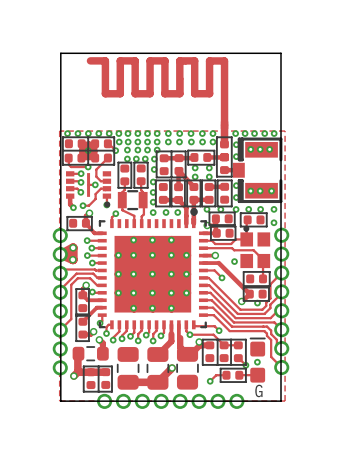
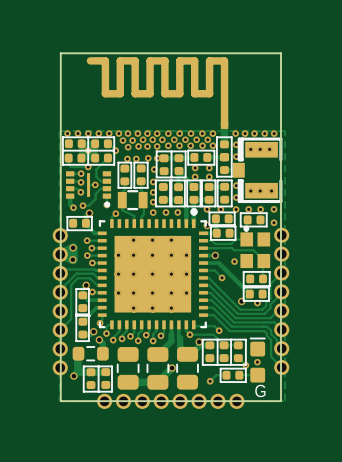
via: none -> (143, 139)
via: none -> (152, 139)
via: none -> (162, 139)
via: none -> (174, 139)
via: none -> (185, 139)
via: none -> (196, 139)
via: none -> (207, 139)
via: none -> (122, 140)
via: none -> (132, 140)
via: (119, 142) -> none
via: (128, 142) -> none
via: (137, 142) -> none
via: (147, 142) -> none
via: (157, 142) -> none
via: (168, 142) -> none
via: (179, 142) -> none
via: (191, 142) -> none
via: (202, 142) -> none
via: (212, 142) -> none
via: none -> (168, 145)
via: none -> (179, 145)
via: none -> (190, 145)
via: none -> (202, 145)
via: none -> (212, 145)
via: none -> (138, 146)
via: none -> (147, 146)
via: none -> (157, 146)
via: none -> (128, 147)
via: (127, 150) -> none
via: (137, 150) -> none
via: (147, 150) -> none
via: (157, 150) -> none
via: (145, 158) -> none
via: none -> (148, 158)
via: none -> (157, 158)
via: (154, 159) -> none

